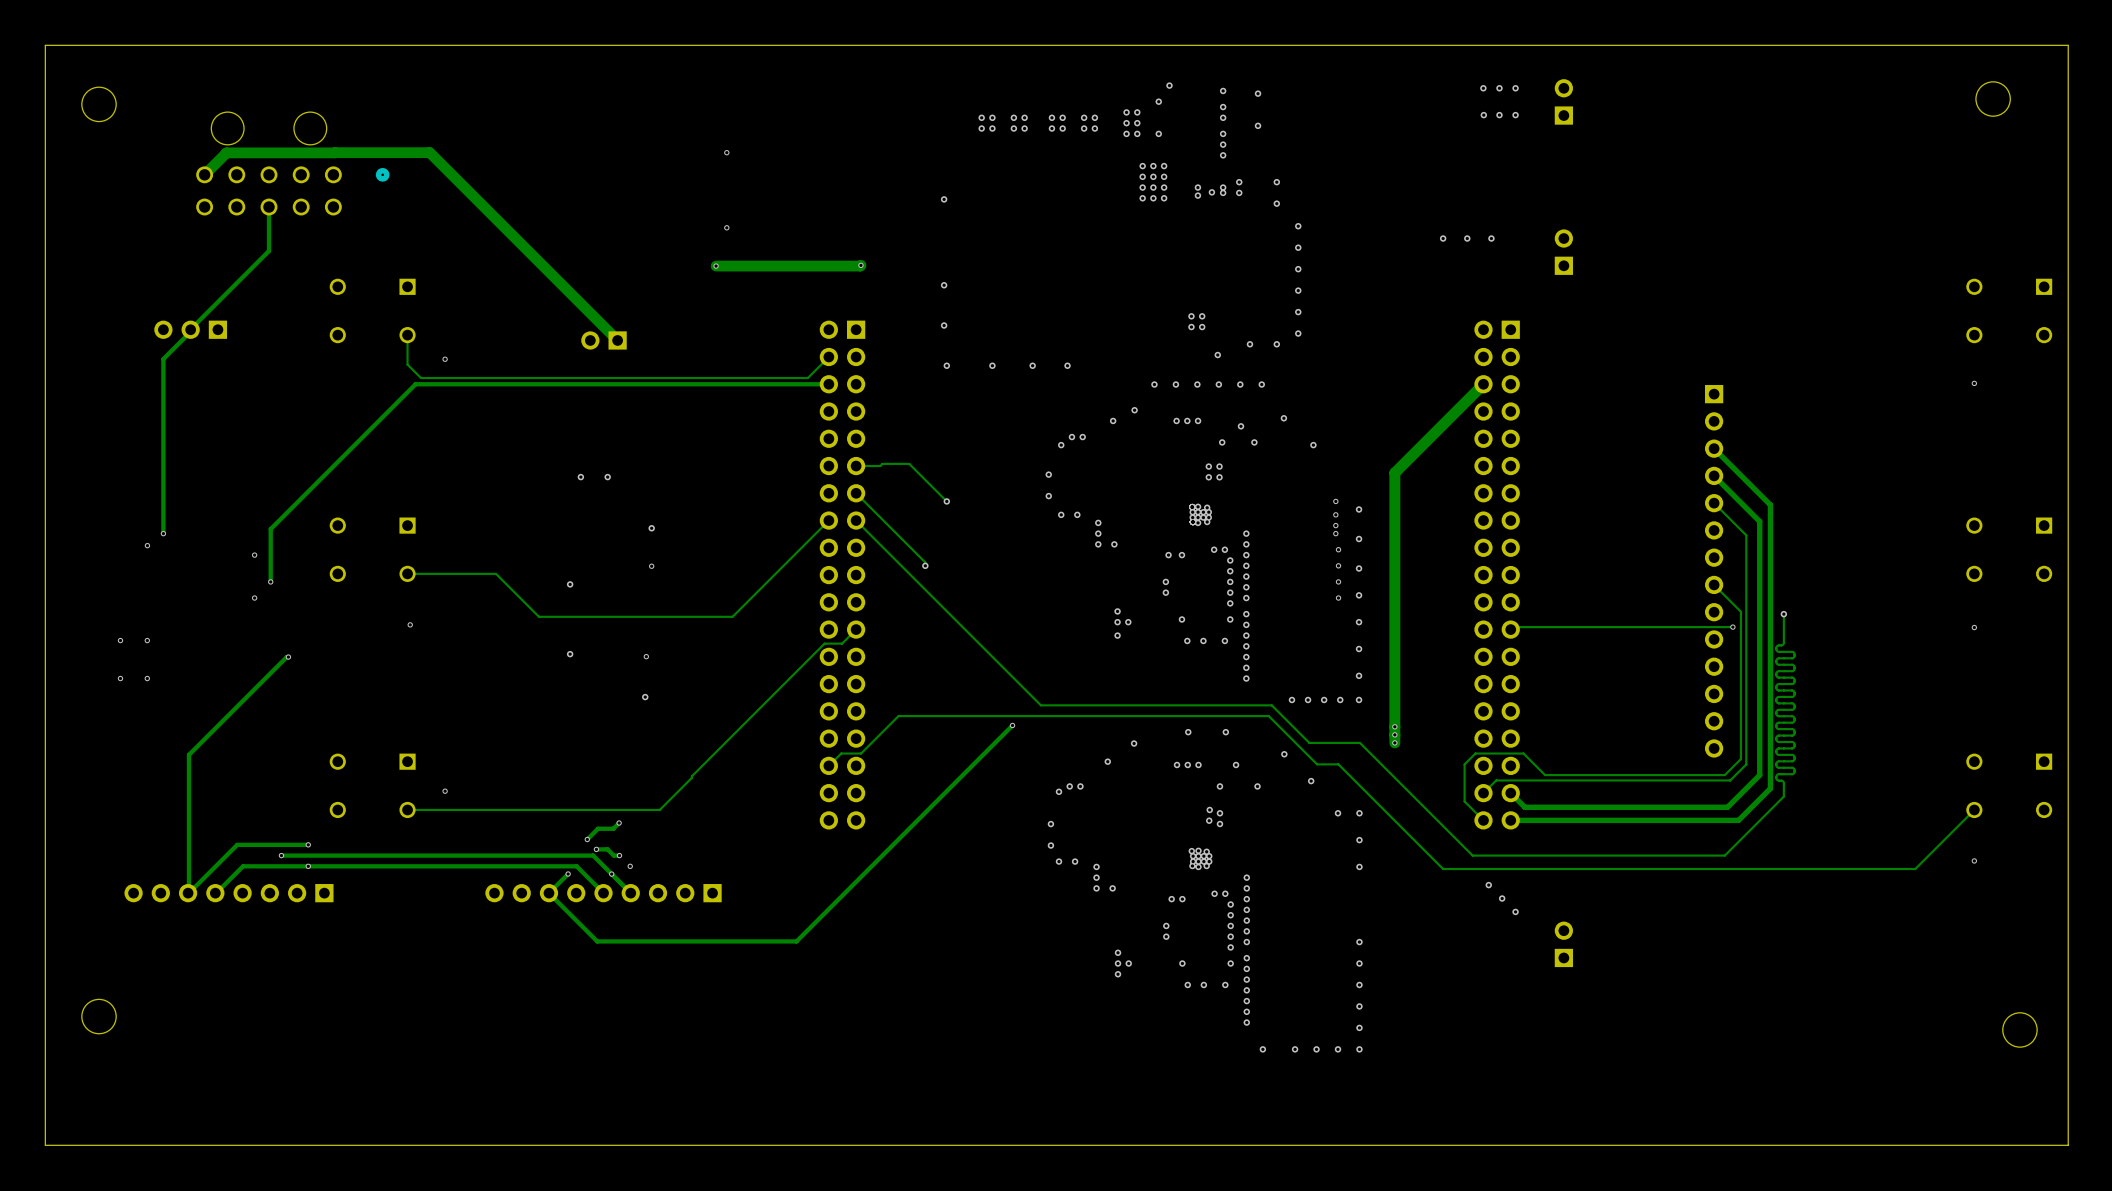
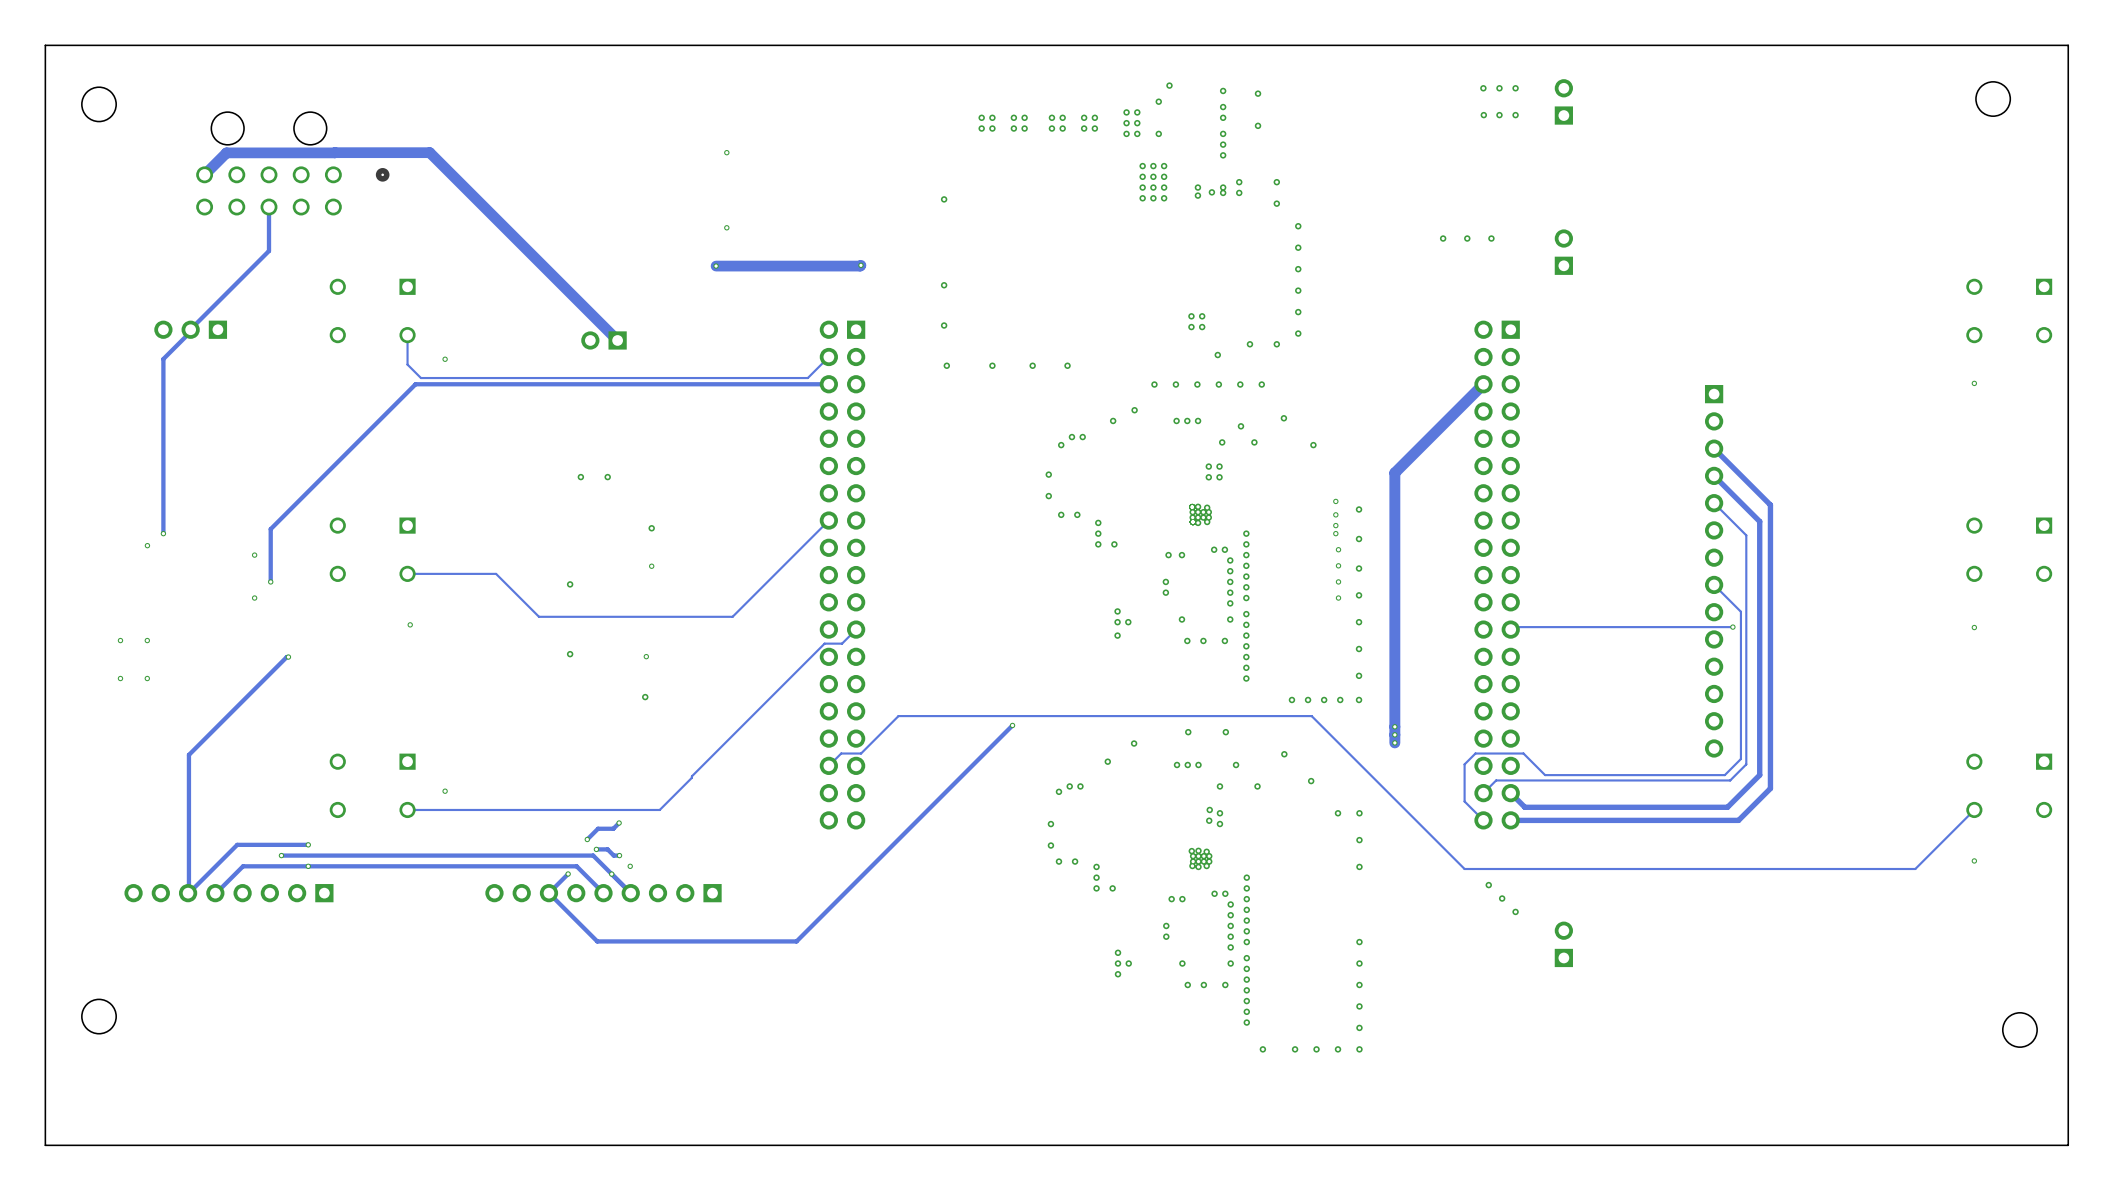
track: (856, 466) (909, 463) (946, 501) -> none
track: (856, 493) (925, 562) (925, 565) -> none
via: (946, 501) -> none
track: (856, 520) (1040, 705) (1271, 705) (1309, 742) (1359, 742) (1472, 855) (1724, 855) (1783, 796) (1783, 782) (1777, 779) (1776, 775) (1792, 774) (1794, 772) (1792, 767) (1778, 767) (1776, 765) (1778, 761) (1792, 761) (1794, 758) (1792, 755) (1778, 754) (1776, 752) (1778, 748) (1792, 748) (1794, 745) (1792, 742) (1778, 741) (1776, 739) (1778, 735) (1792, 735) (1794, 733) (1792, 729) (1778, 729) (1776, 726) (1778, 722) (1792, 722) (1794, 720) (1792, 716) (1778, 716) (1776, 713) (1778, 709) (1792, 709) (1794, 707) (1792, 703) (1778, 703) (1776, 701) (1778, 697) (1792, 696) (1794, 694) (1792, 690) (1778, 690) (1776, 688) (1778, 684) (1792, 684) (1794, 681) (1792, 677) (1778, 677) (1776, 675) (1778, 671) (1792, 671) (1794, 668) (1792, 664) (1778, 664) (1776, 662) (1778, 658) (1792, 658) (1794, 656) (1792, 652) (1778, 651) (1776, 649) (1777, 645) (1783, 643) (1783, 614) -> none
via: (925, 565) -> none
via: (1783, 614) -> none
track: (1268, 716) (1317, 764) (1338, 764) (1443, 869) (1464, 869) -> (1268, 716) (1311, 716) (1464, 869)

